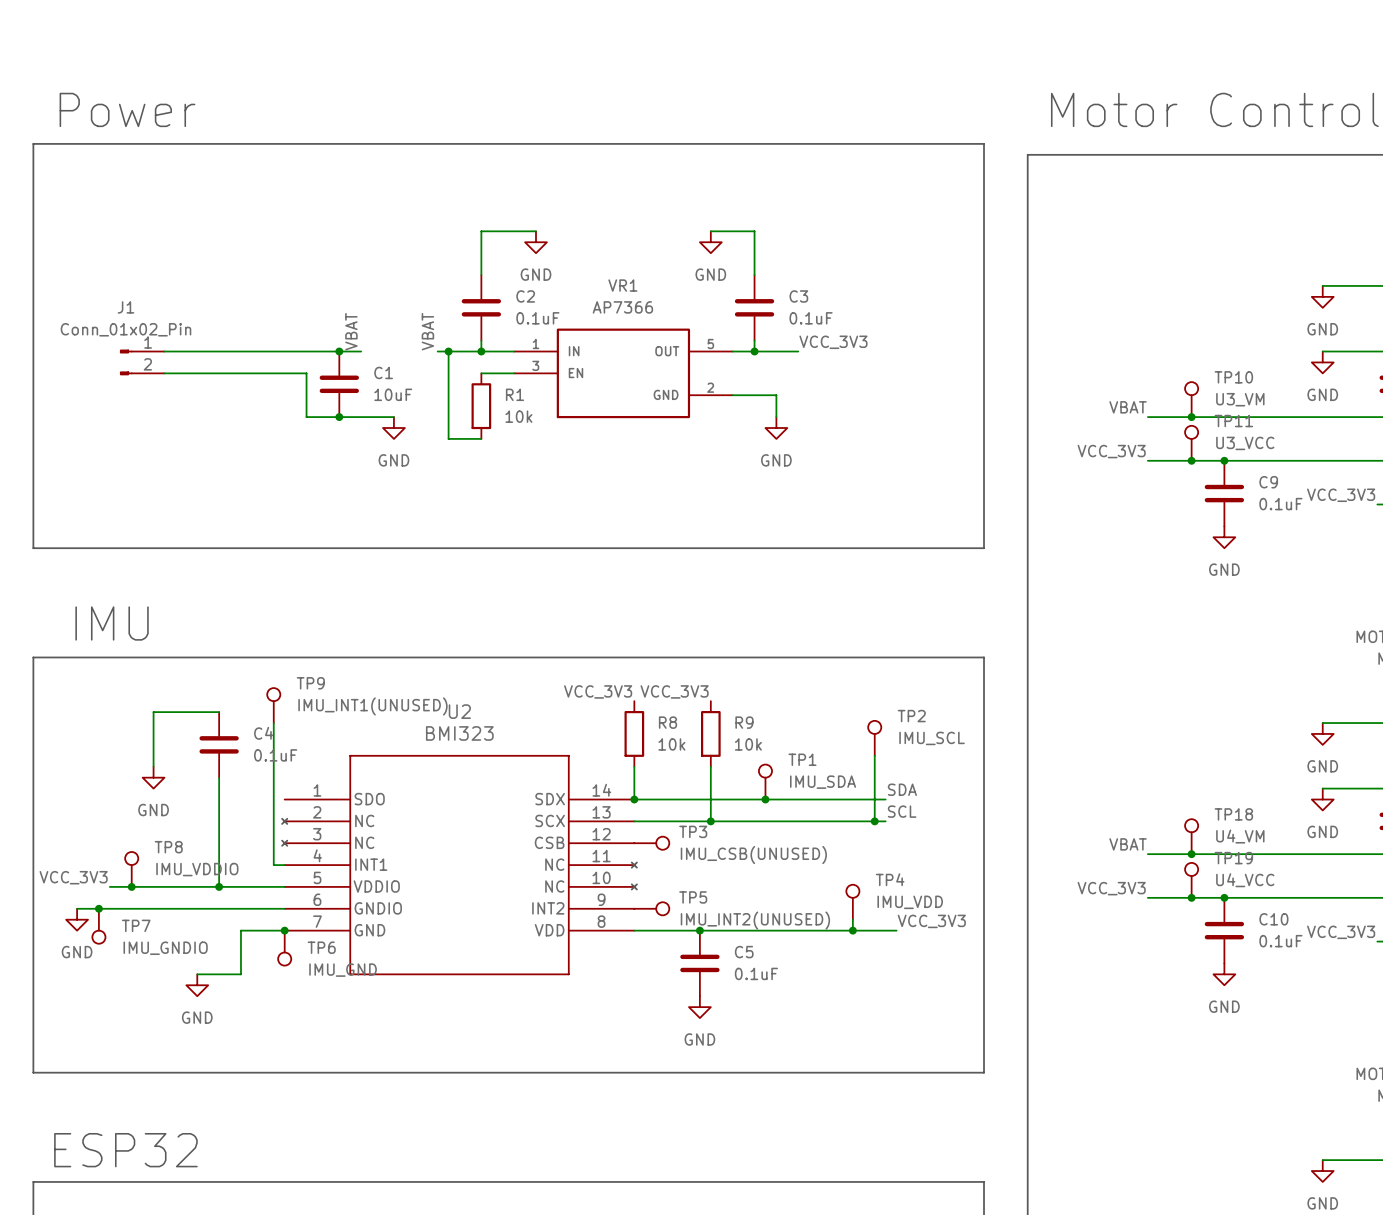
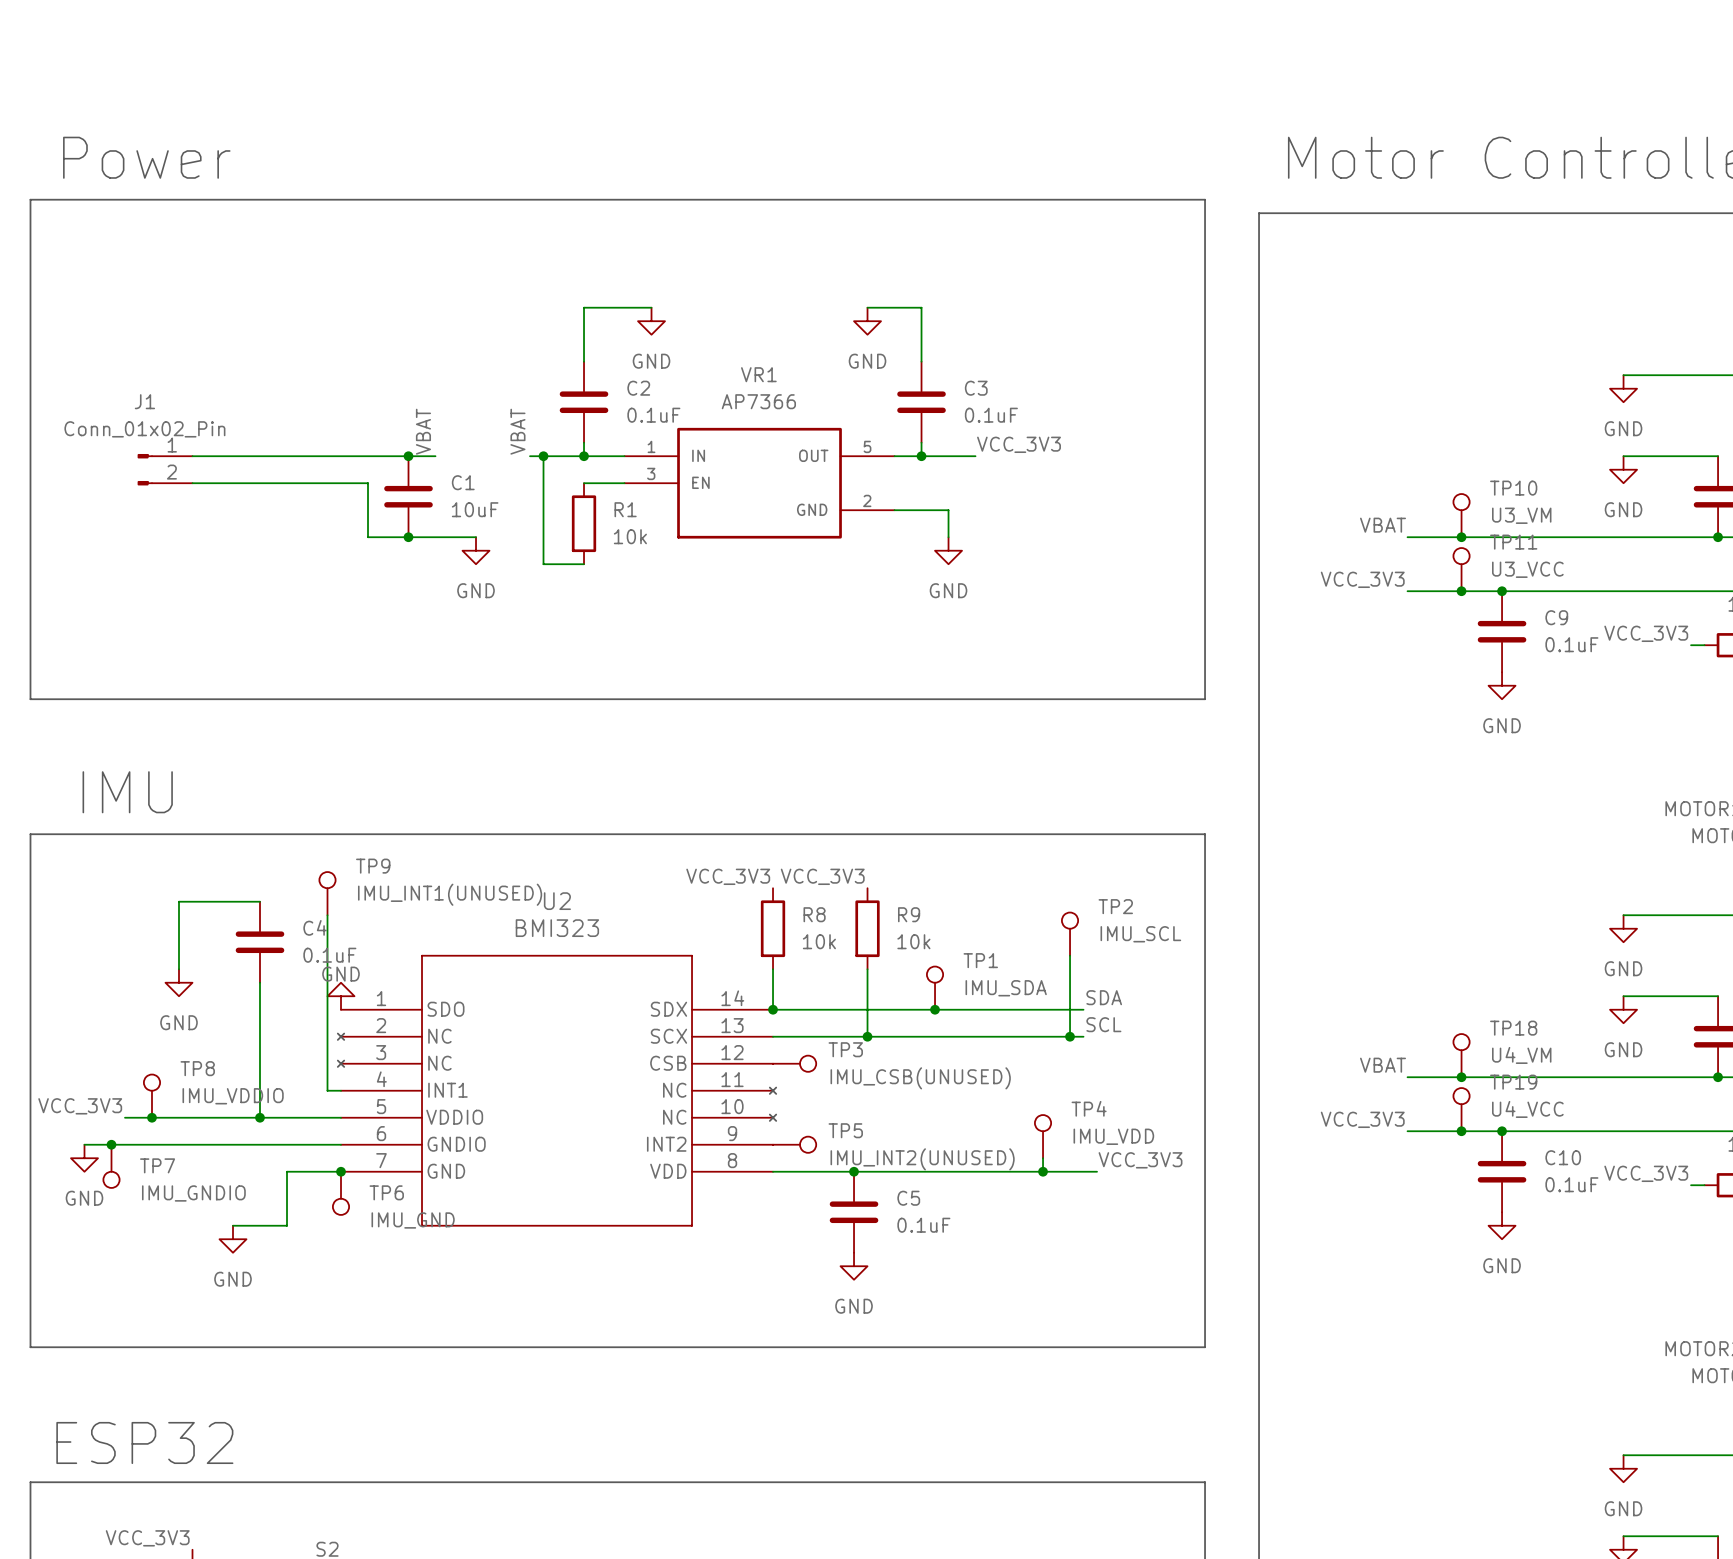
power symbol: none -> GND (341, 996)

